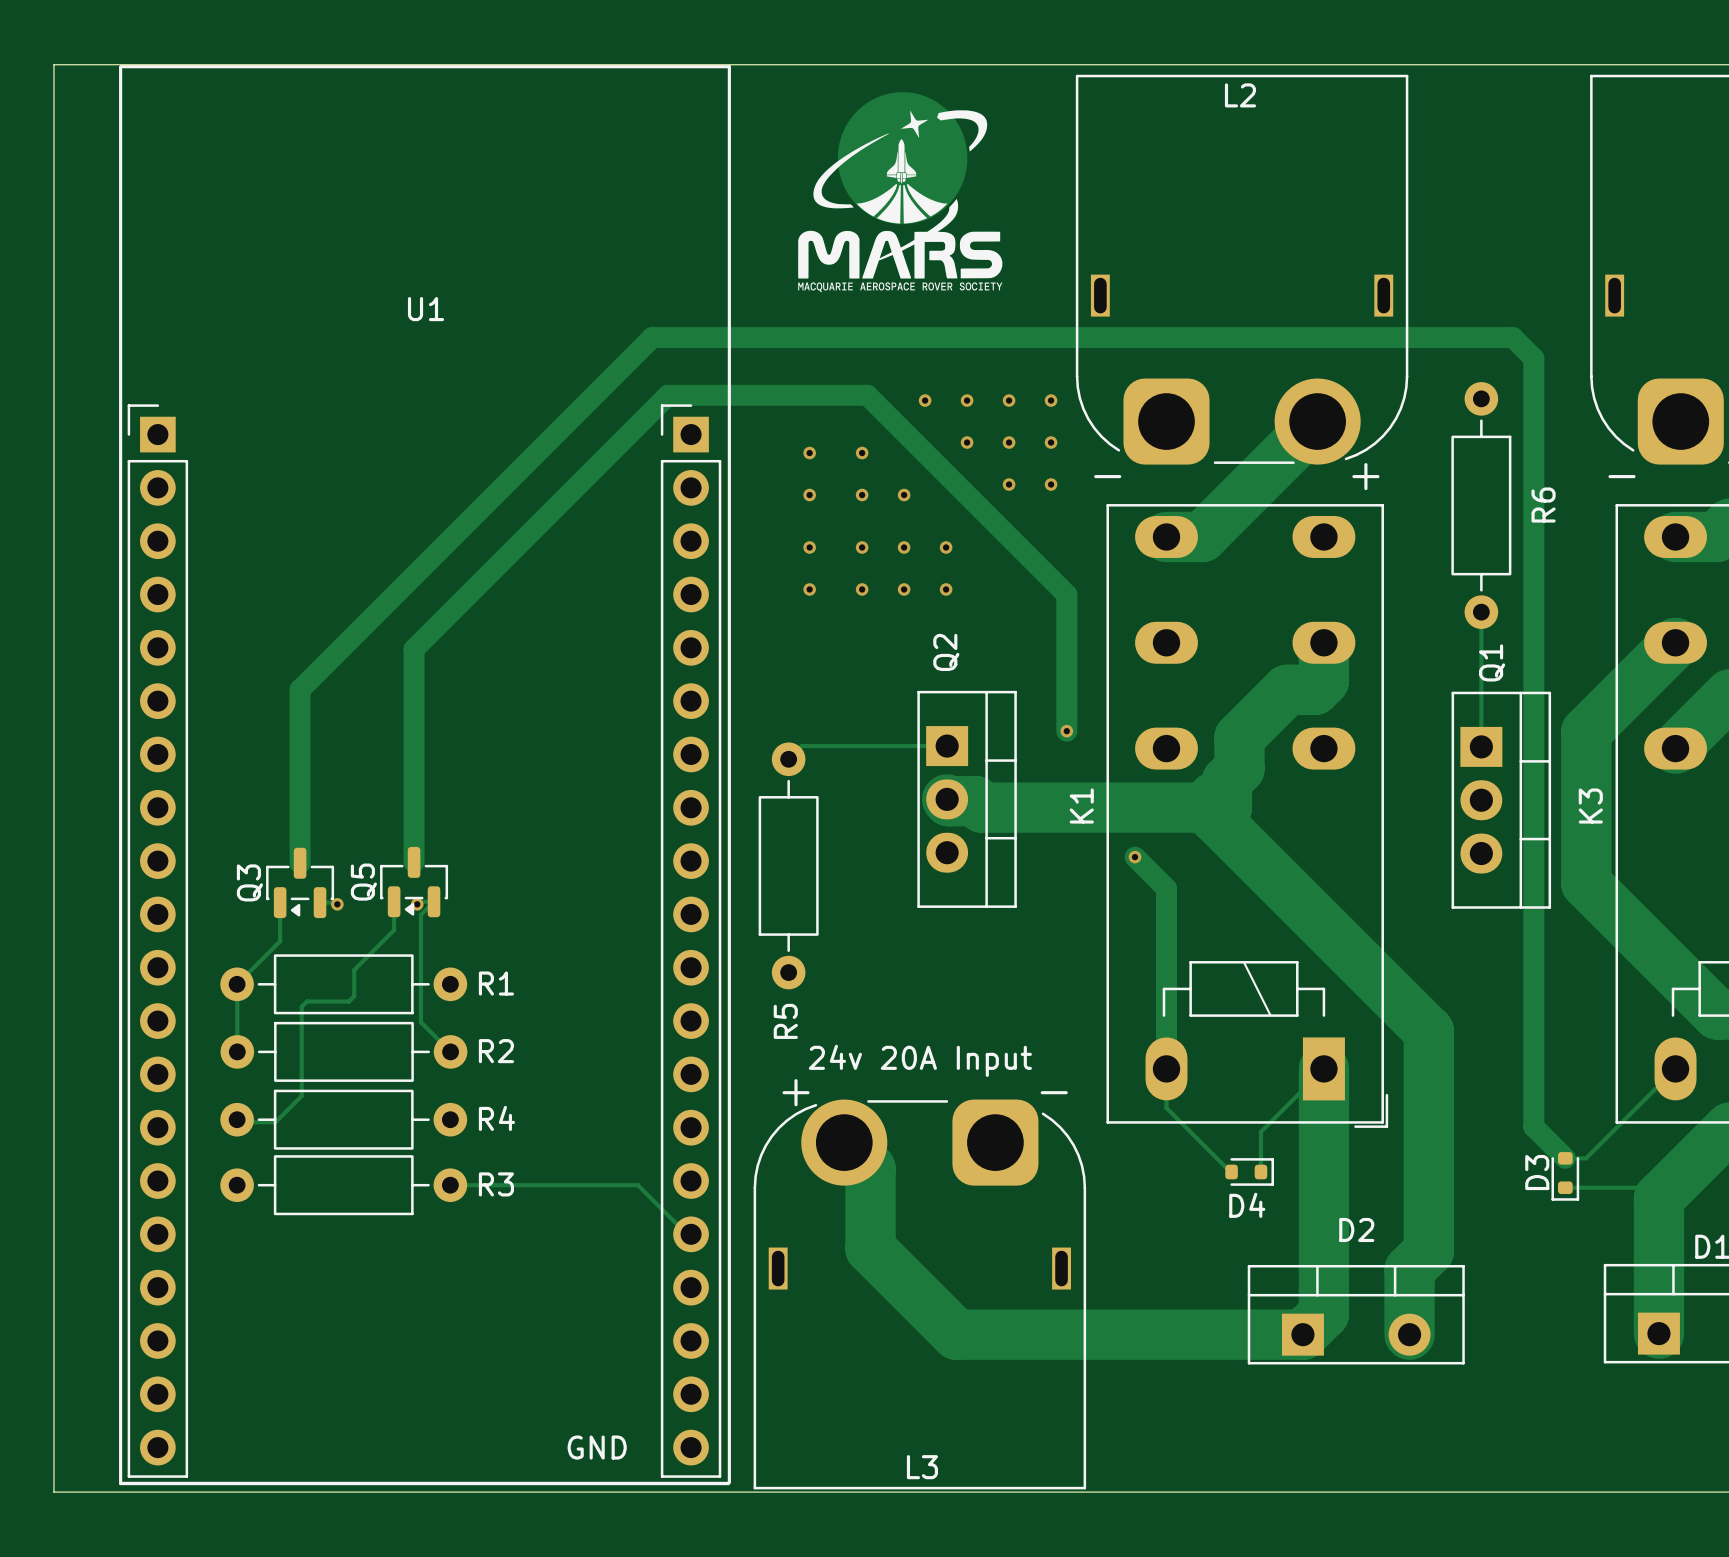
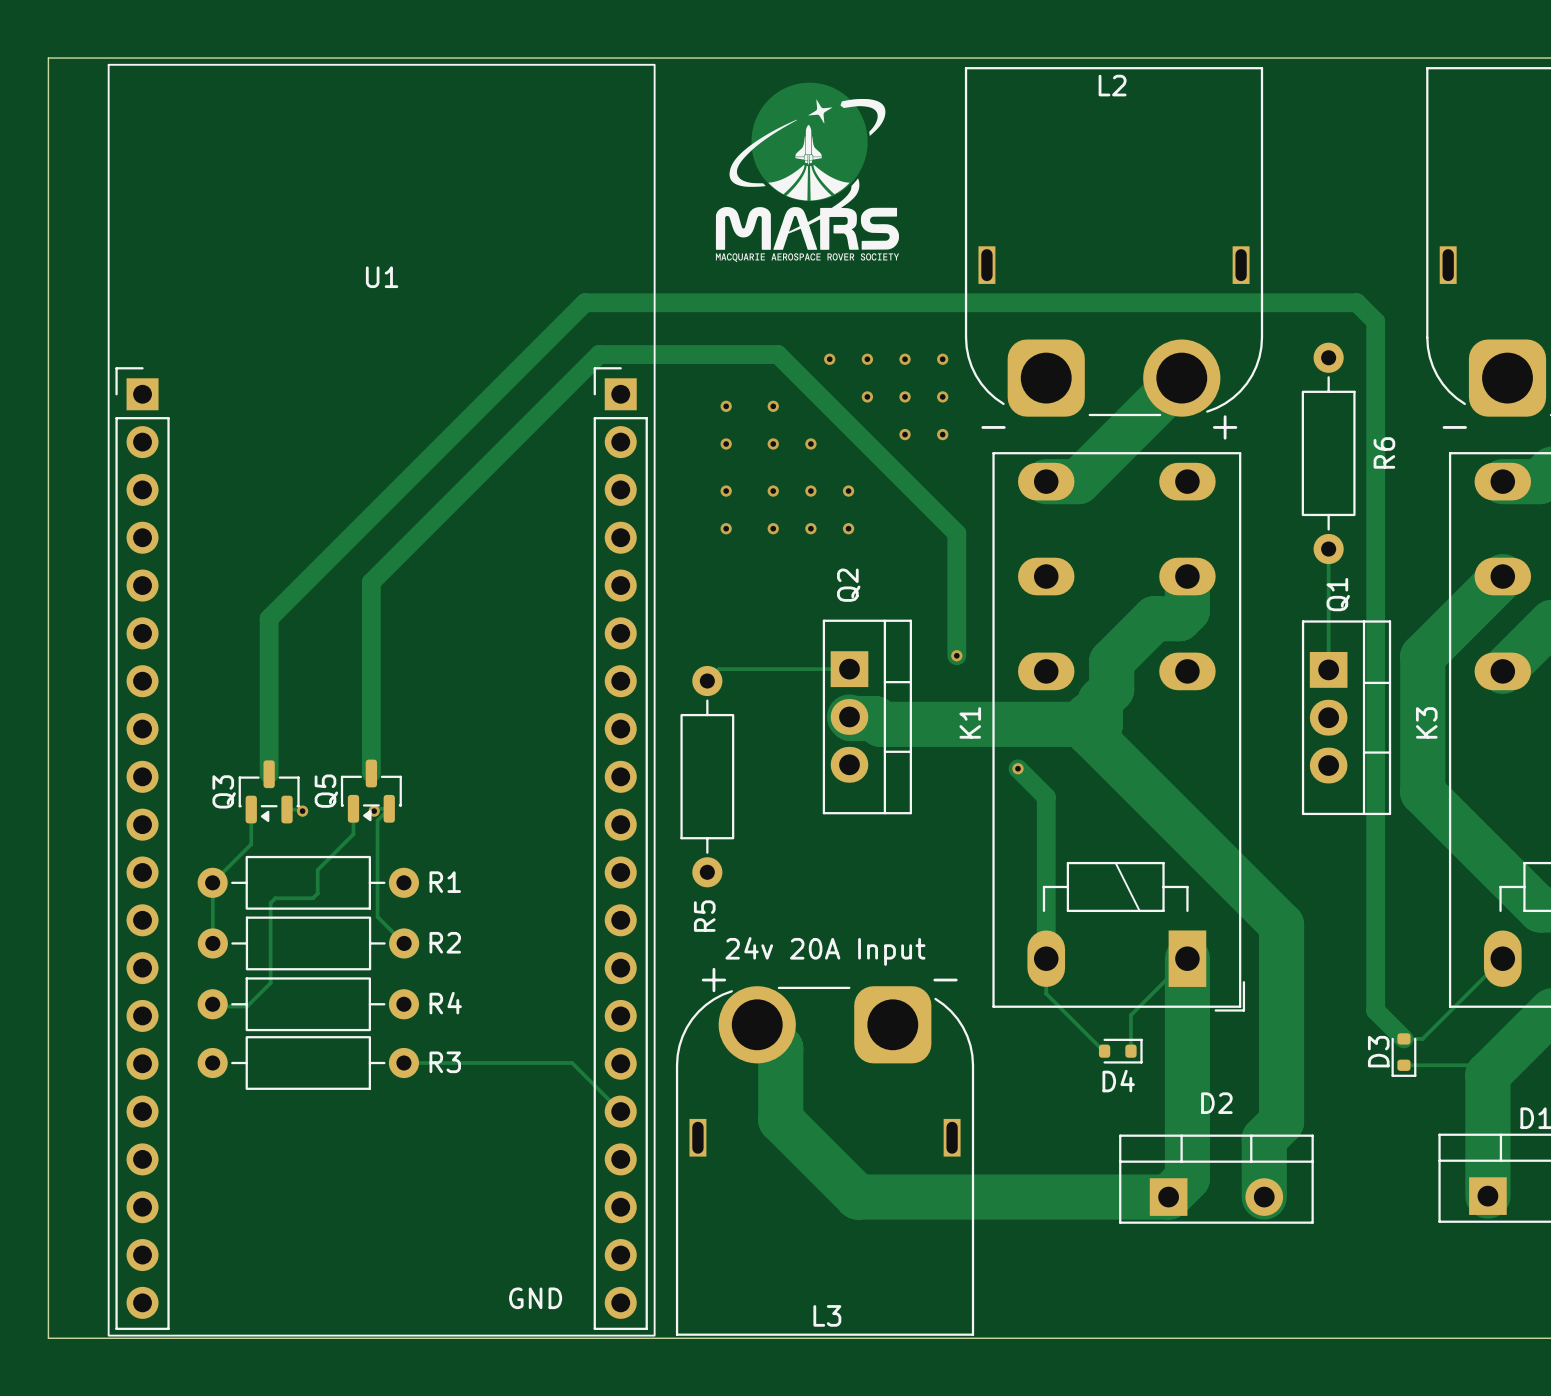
U1 footprint: [119, 64, 731, 1486] -> [107, 63, 656, 1337]

